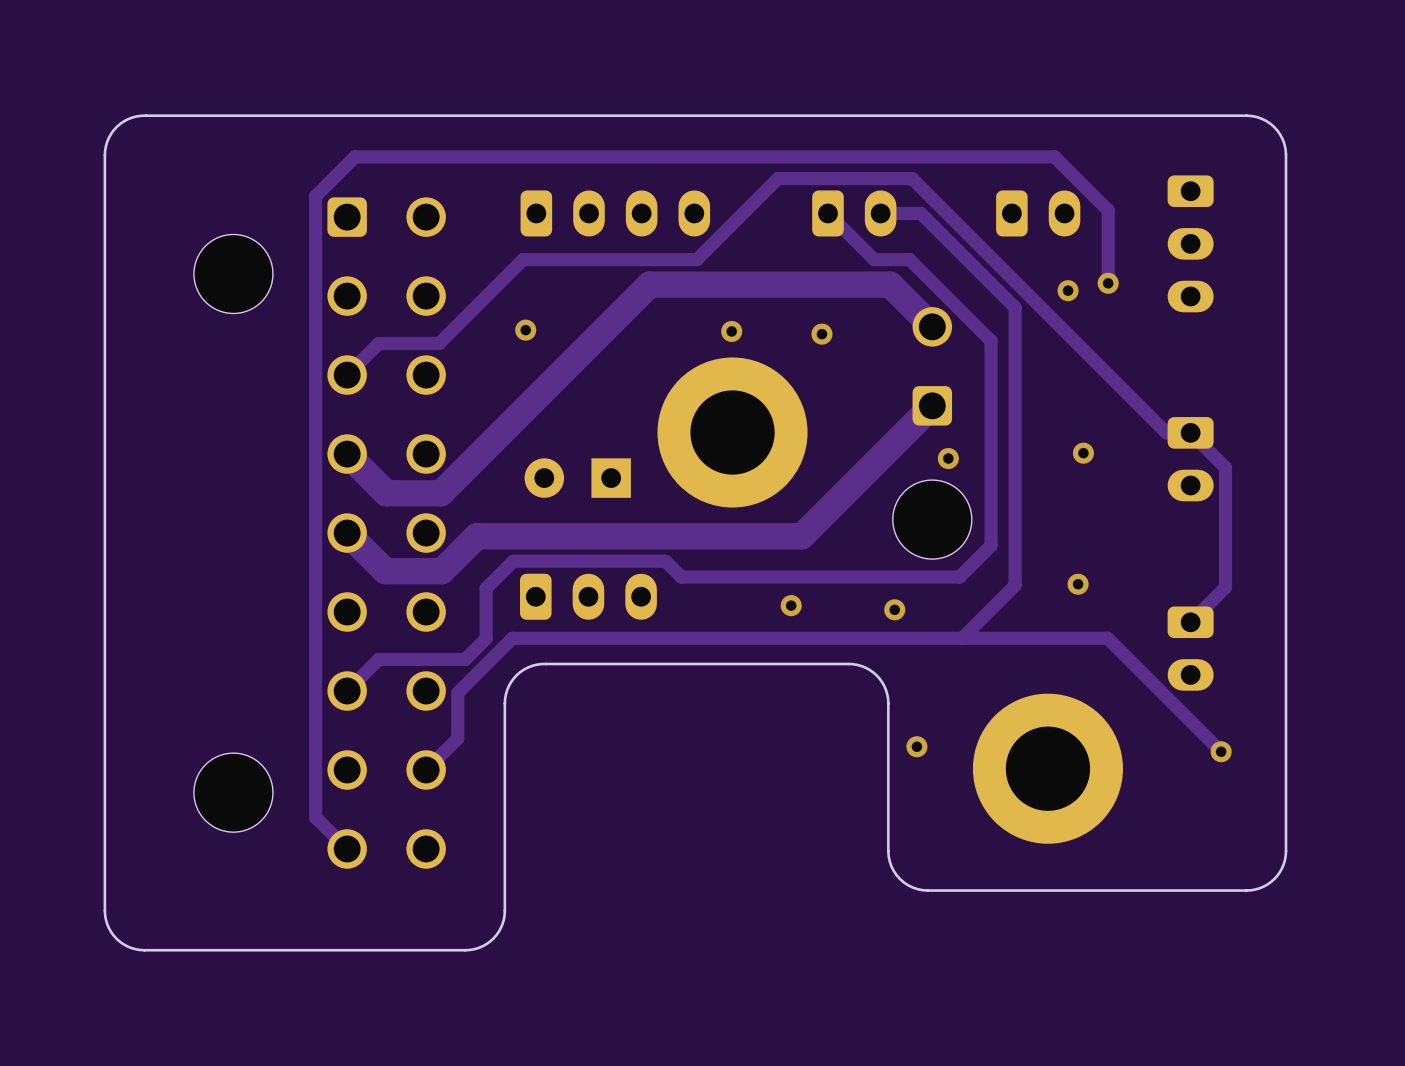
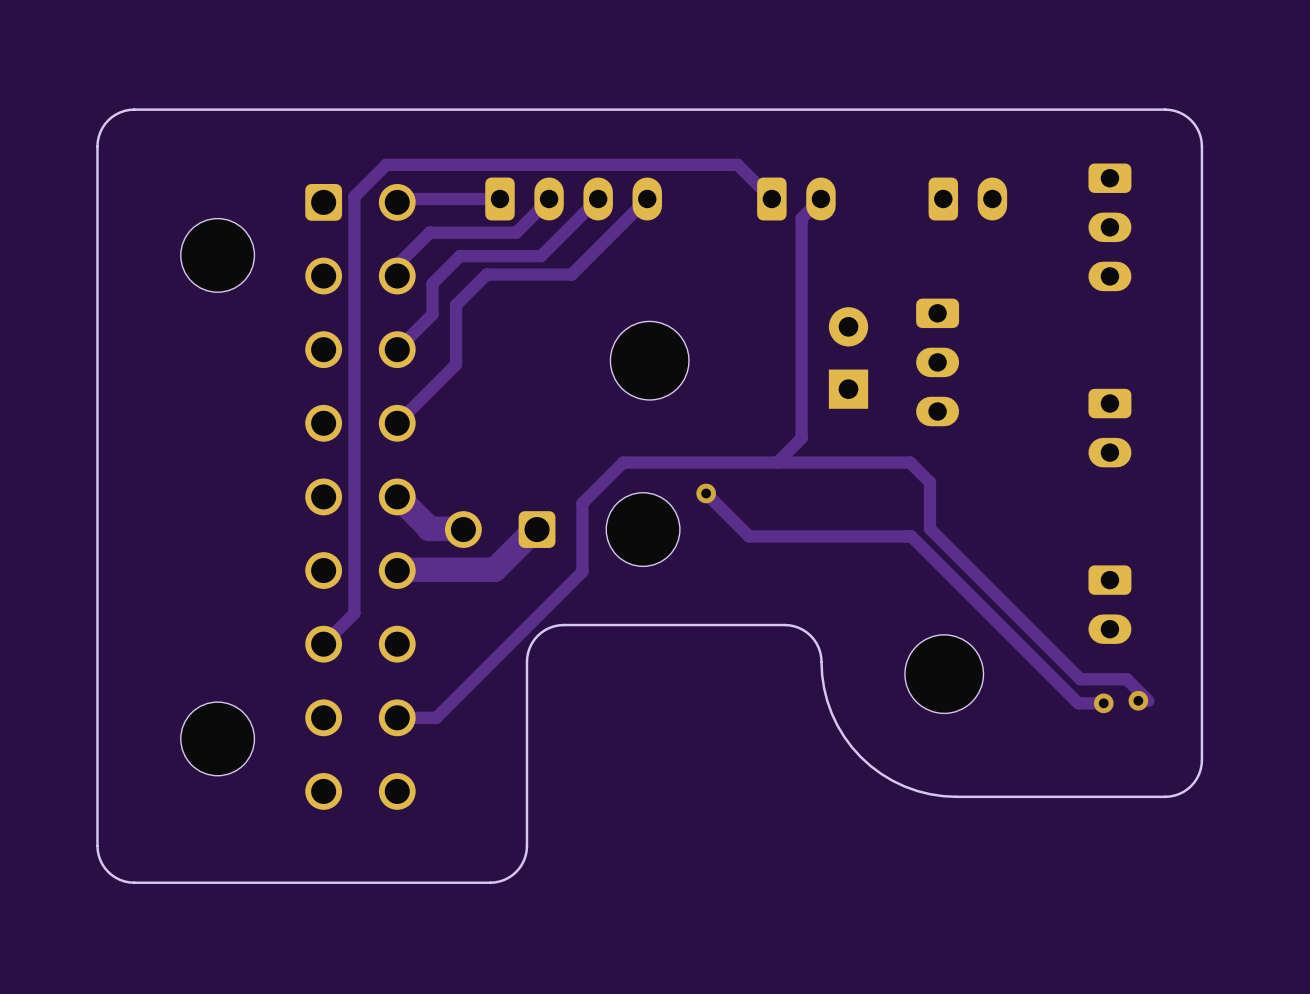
board edge: (1246, 115) (146, 115) (132, 117) (120, 123) (109, 137) (104, 155) (104, 910) (107, 923) (113, 935) (127, 946) (144, 950) (465, 950) (486, 944) (498, 931) (504, 915) (505, 694) (511, 681) (520, 671) (532, 665) (541, 664) (848, 663) (869, 670) (882, 682) (888, 699) (889, 861) (899, 878) (917, 889) (1246, 890) (1259, 888) (1271, 881) (1282, 868) (1285, 851) (1285, 154) (1282, 139) (1274, 126) (1261, 118) (1246, 115) -> (1165, 109) (1179, 112) (1191, 120) (1199, 132) (1201, 146) (1201, 760) (1199, 774) (1187, 789) (1179, 794) (1165, 796) (956, 796) (917, 791) (892, 780) (870, 766) (844, 736) (827, 701) (818, 647) (810, 635) (798, 627) (784, 625) (558, 625) (541, 632) (534, 639) (528, 652) (526, 850) (522, 864) (508, 877) (490, 882) (134, 882) (120, 879) (105, 868) (98, 855) (97, 845) (97, 146) (102, 128) (111, 117) (120, 112) (134, 109) (1165, 109)
track: none -> (499, 198) (400, 198) (397, 202)
track: none -> (549, 198) (516, 232) (429, 232)
track: none -> (598, 198) (541, 256) (459, 256) (432, 283) (432, 314) (397, 349)
track: none -> (647, 198) (571, 274) (486, 274) (456, 305) (456, 364) (397, 423)
track: (827, 213) (874, 259) (909, 259) (991, 340) (991, 545) (959, 577) (681, 577) (665, 561) (513, 561) (486, 588) (486, 638) (465, 659) (378, 659) -> (771, 198) (737, 164) (386, 164) (354, 196) (353, 614)
track: (880, 213) (921, 213) (1015, 307) (1015, 585) (962, 638) -> (820, 198) (801, 218) (801, 438) (777, 462)
track: none -> (429, 232) (397, 265) (397, 276)
track: (1108, 283) (1108, 210) (1054, 156) (354, 156) (315, 196) (315, 817) (347, 848) -> none
via: (1108, 283) -> none
via: (1068, 290) -> none
track: (932, 326) (890, 284) (649, 284) (440, 493) (386, 493) (347, 454) -> none
via: (525, 330) -> none
via: (731, 331) -> none
via: (821, 334) -> none
track: (347, 375) (378, 343) (439, 343) (523, 259) (696, 259) (777, 178) (912, 178) (1166, 432) (1190, 432) (1225, 467) (1225, 587) (1190, 622) -> none
part: none -> (848, 357)
part: none -> (649, 360)
track: (932, 405) (801, 536) (476, 536) (441, 571) (385, 571) (347, 533) -> none
part: (732, 432) -> none
part rotation: 0° (932, 433) -> 90° counterclockwise (562, 529)
part position: (932, 433) -> (562, 529)
via: (1083, 453) -> none
via: (948, 458) -> none
part: (577, 478) -> none
track: none -> (706, 493) (749, 536) (911, 536) (1078, 703) (1103, 703)
via: none -> (706, 493)
track: none -> (397, 496) (429, 528) (463, 528)
track: none -> (537, 529) (534, 529) (494, 569) (397, 569)
via: (1078, 584) -> none
part rotation: 0° (588, 596) -> 90° clockwise (937, 362)
part position: (588, 596) -> (937, 362)
via: (791, 605) -> none
via: (894, 609) -> none
part: none -> (944, 674)
via: (916, 746) -> none
track: (1221, 751) (1107, 638) (512, 638) (457, 693) (457, 738) (426, 769) -> (1148, 700) (1126, 679) (1080, 679) (929, 528) (929, 482) (910, 462) (623, 462) (582, 503) (582, 571) (436, 717) (397, 717)
via: none -> (1103, 703)
part: (1047, 768) -> none

